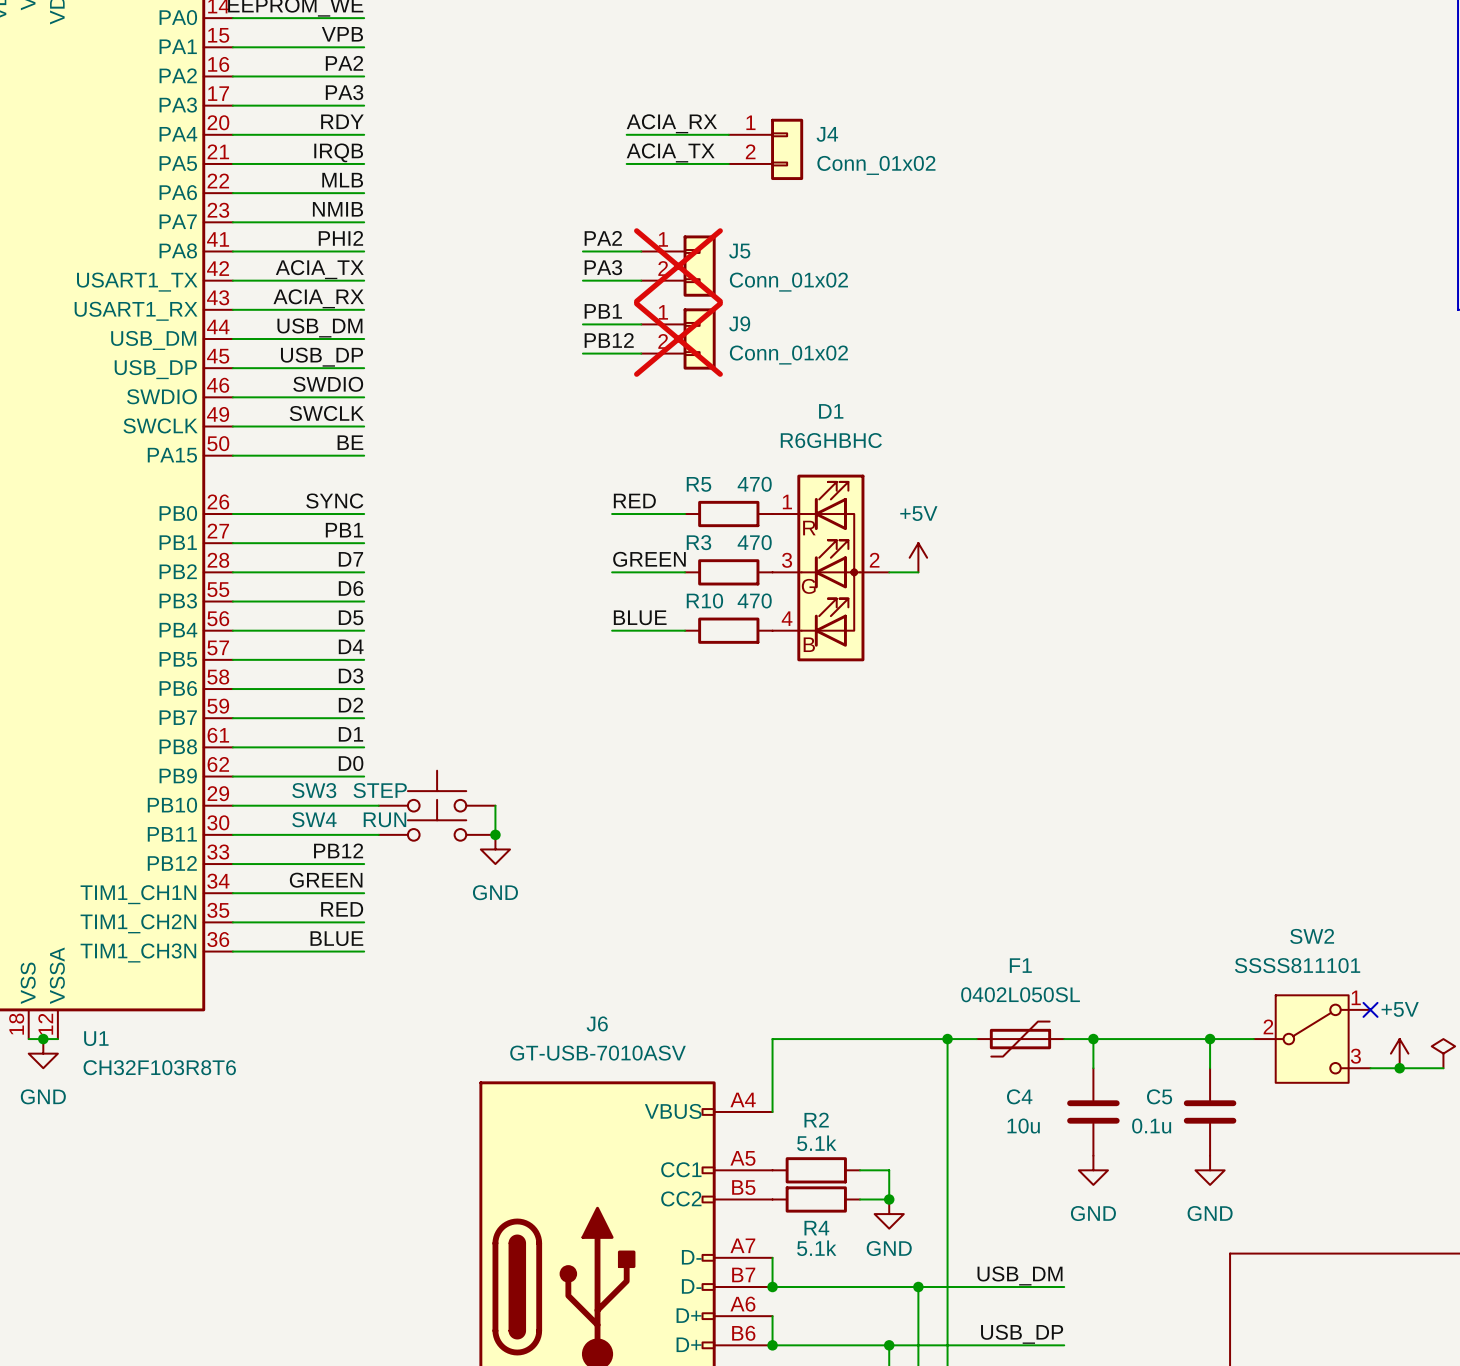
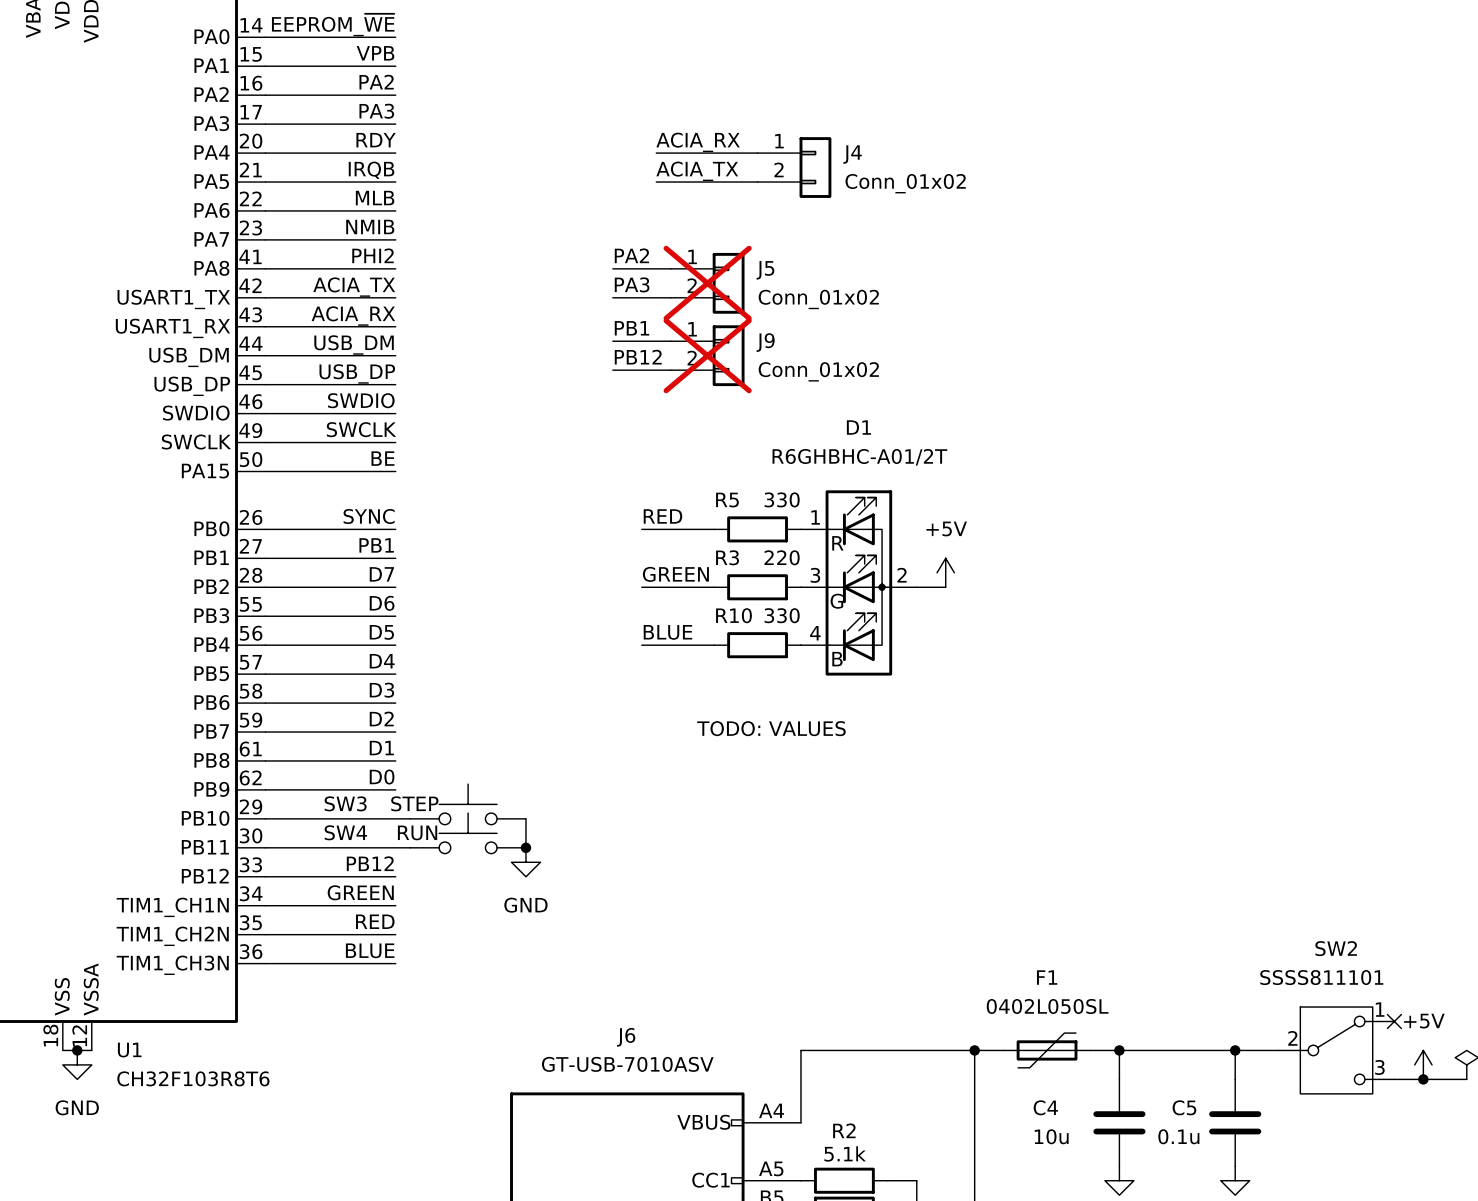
D1 value: R6GHBHC (831, 440) -> R6GHBHC-A01/2T (859, 457)
R5 value: 470 (754, 484) -> 330 (782, 499)
R3 value: 470 (754, 542) -> 220 (782, 557)
R10 value: 470 (754, 600) -> 330 (782, 615)
text: none -> TODO: VALUES (771, 728)

